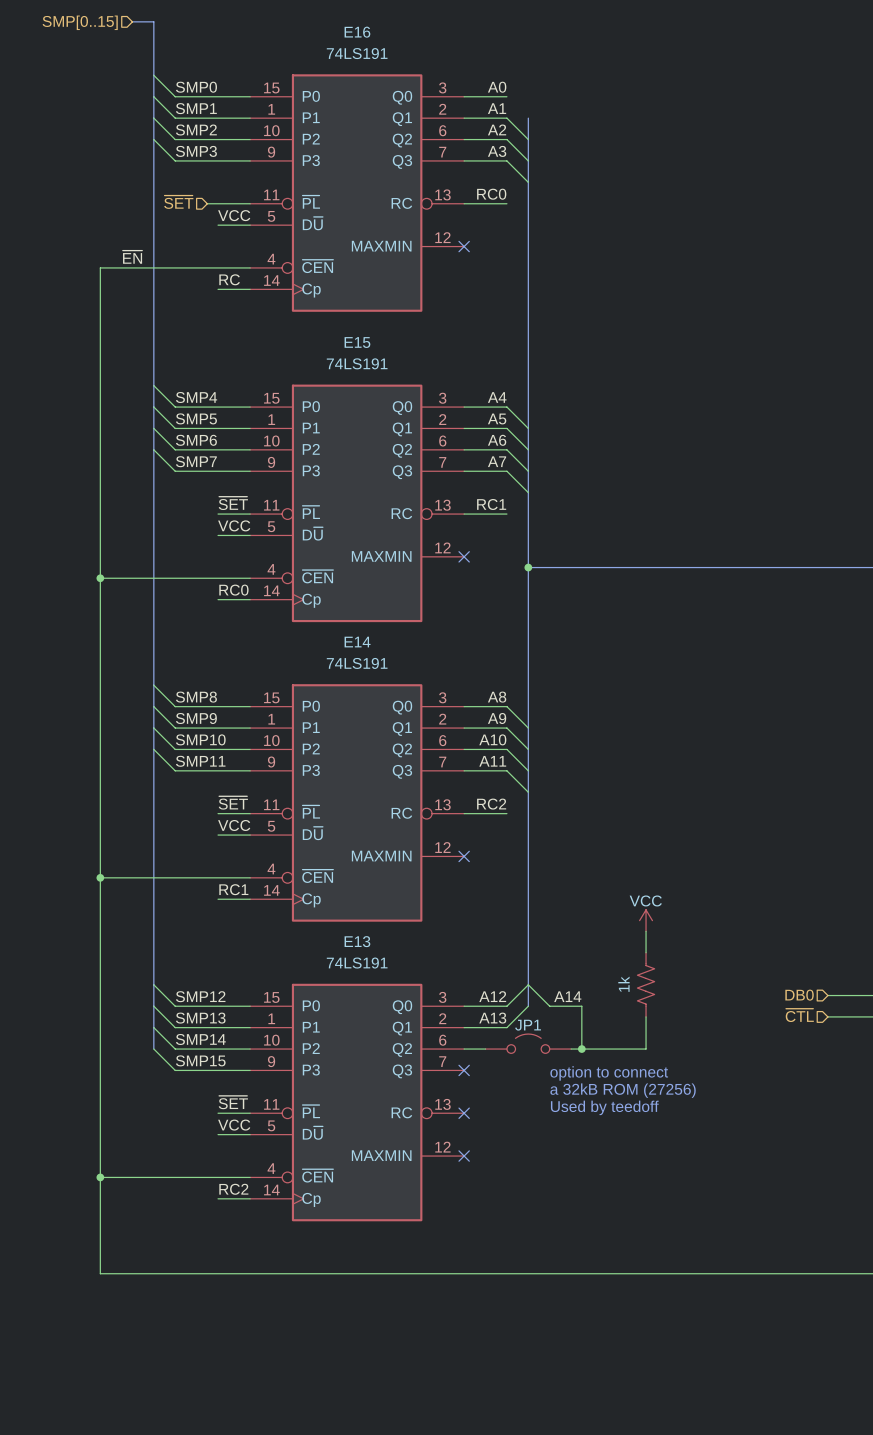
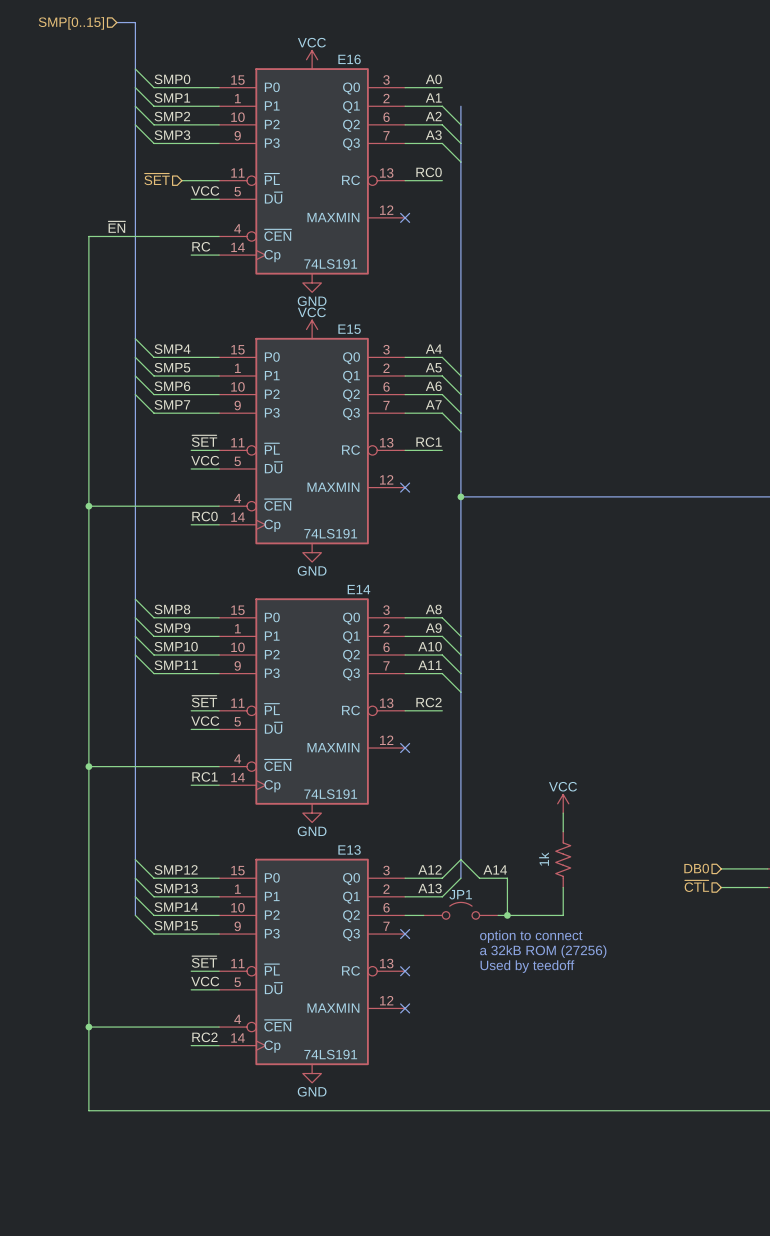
E16 name position: E16 (357, 32) -> E16 (349, 59)
E16 value position: 74LS191 (357, 53) -> 74LS191 (330, 264)
power symbol: none -> VCC (312, 59)
power symbol: none -> GND (312, 282)
E15 name position: E15 (357, 342) -> E15 (349, 329)
E15 value position: 74LS191 (357, 363) -> 74LS191 (330, 533)
power symbol: none -> VCC (312, 329)
power symbol: none -> GND (312, 552)
E14 name position: E14 (357, 642) -> E14 (358, 589)
E14 value position: 74LS191 (357, 663) -> 74LS191 (330, 794)
power symbol: none -> GND (312, 813)
E13 name position: E13 (357, 941) -> E13 (349, 849)
E13 value position: 74LS191 (357, 963) -> 74LS191 (330, 1054)
power symbol: none -> GND (312, 1073)

